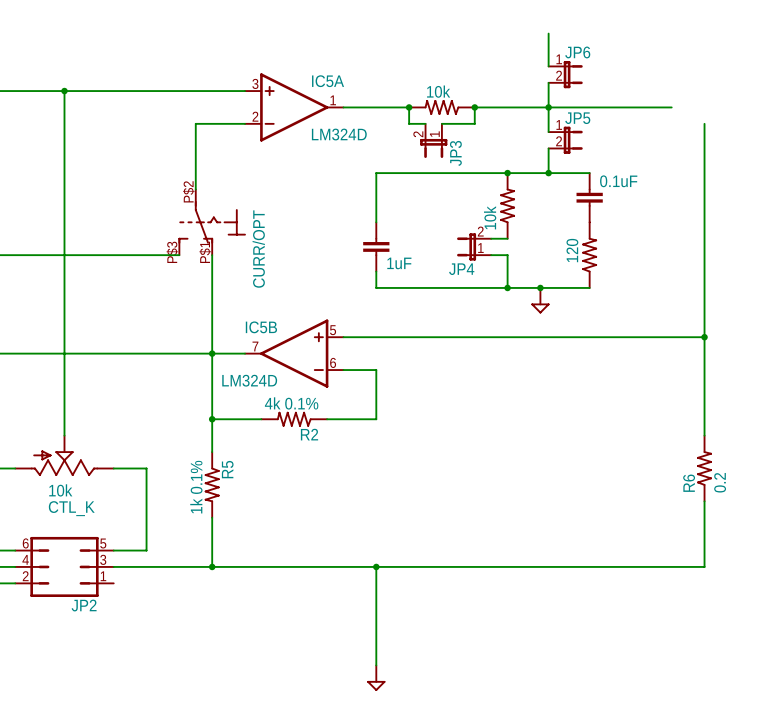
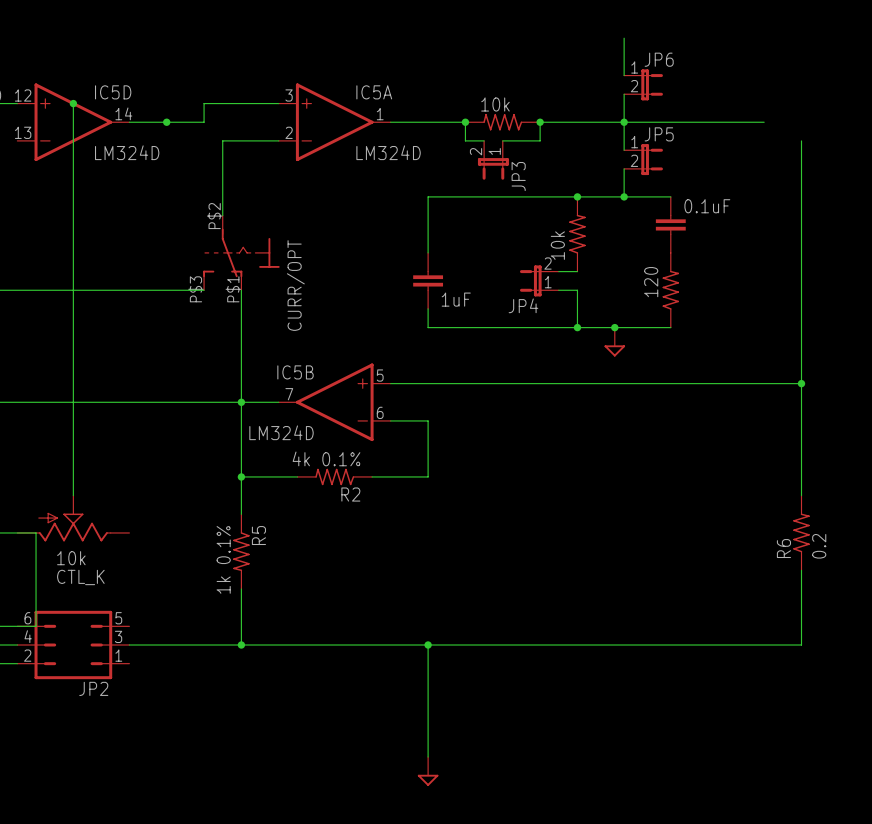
wire: (15, 91) (179, 91) -> (129, 122) (204, 122) (204, 103)
IC5D: none -> LM324D (73, 122)
junction: none -> (166, 122)
wire: none -> (17, 532) (36, 532) (36, 626) (17, 626)
wire: (113, 468) (146, 468) (146, 550) (113, 550) -> none

